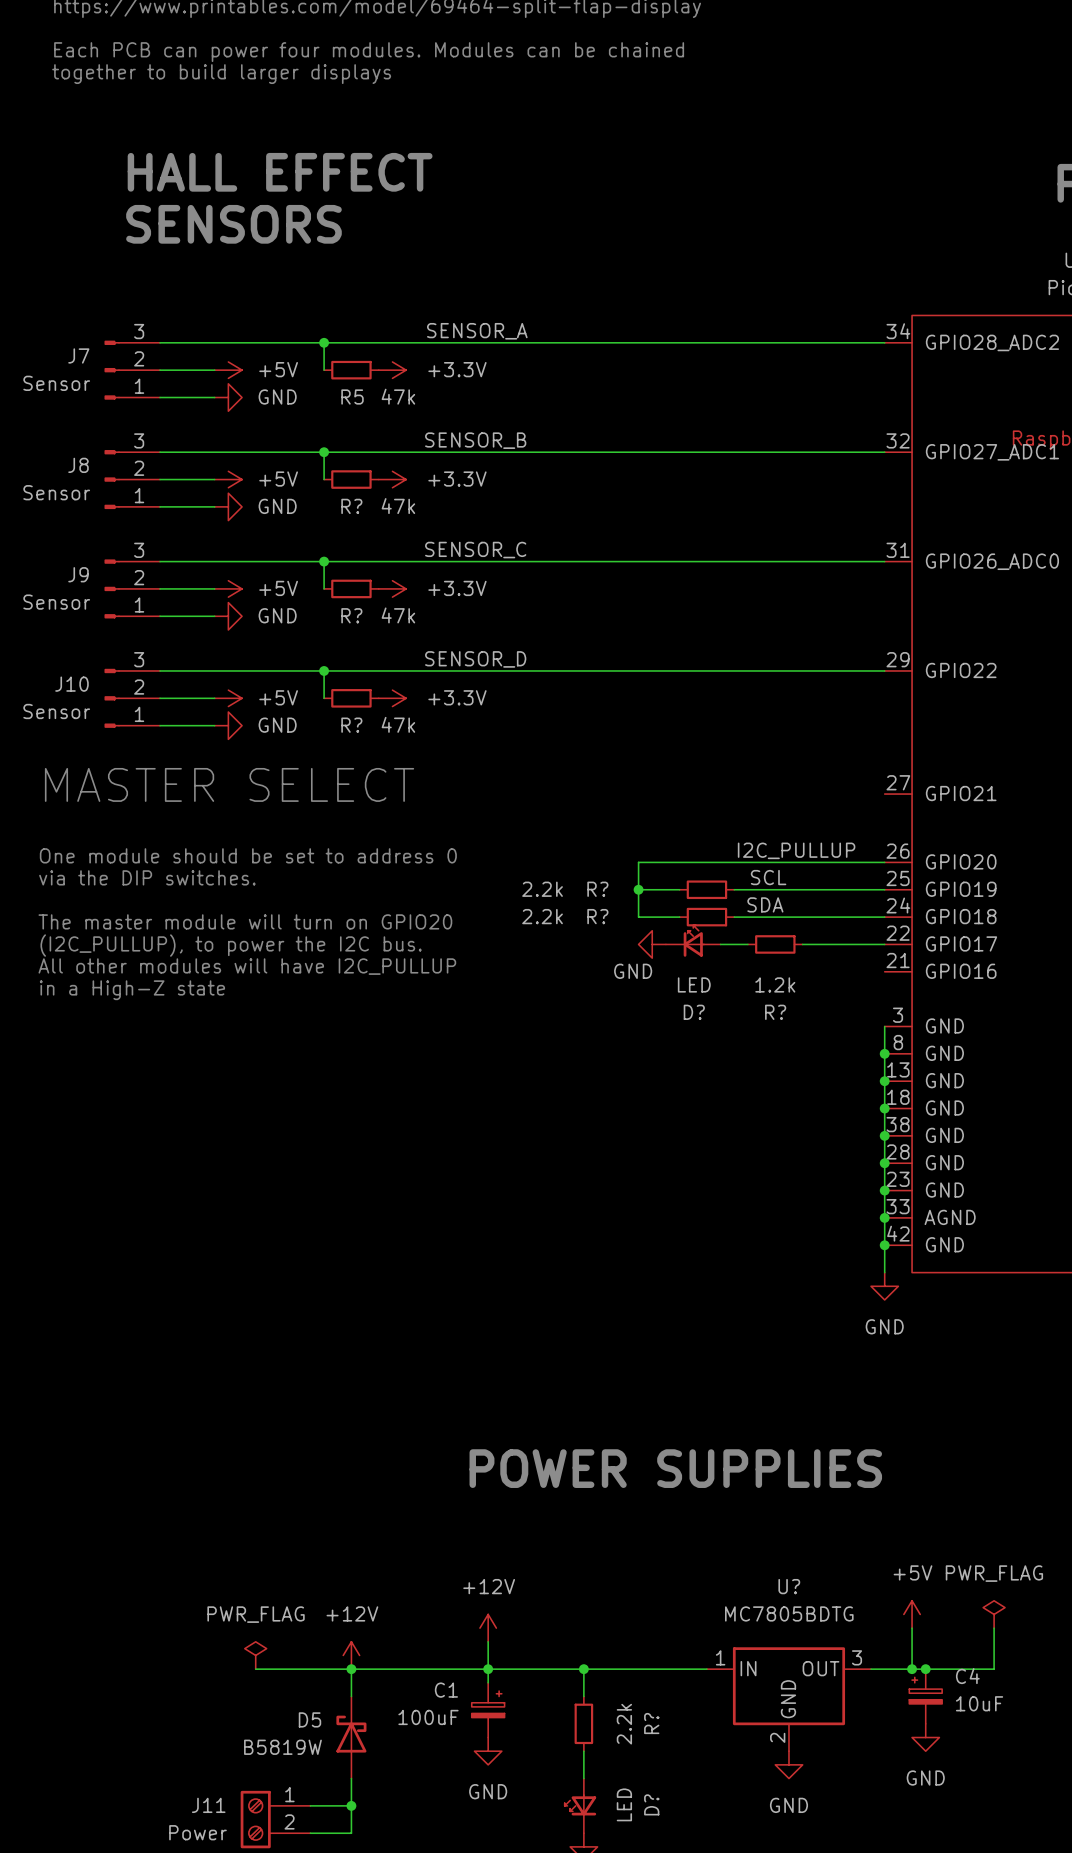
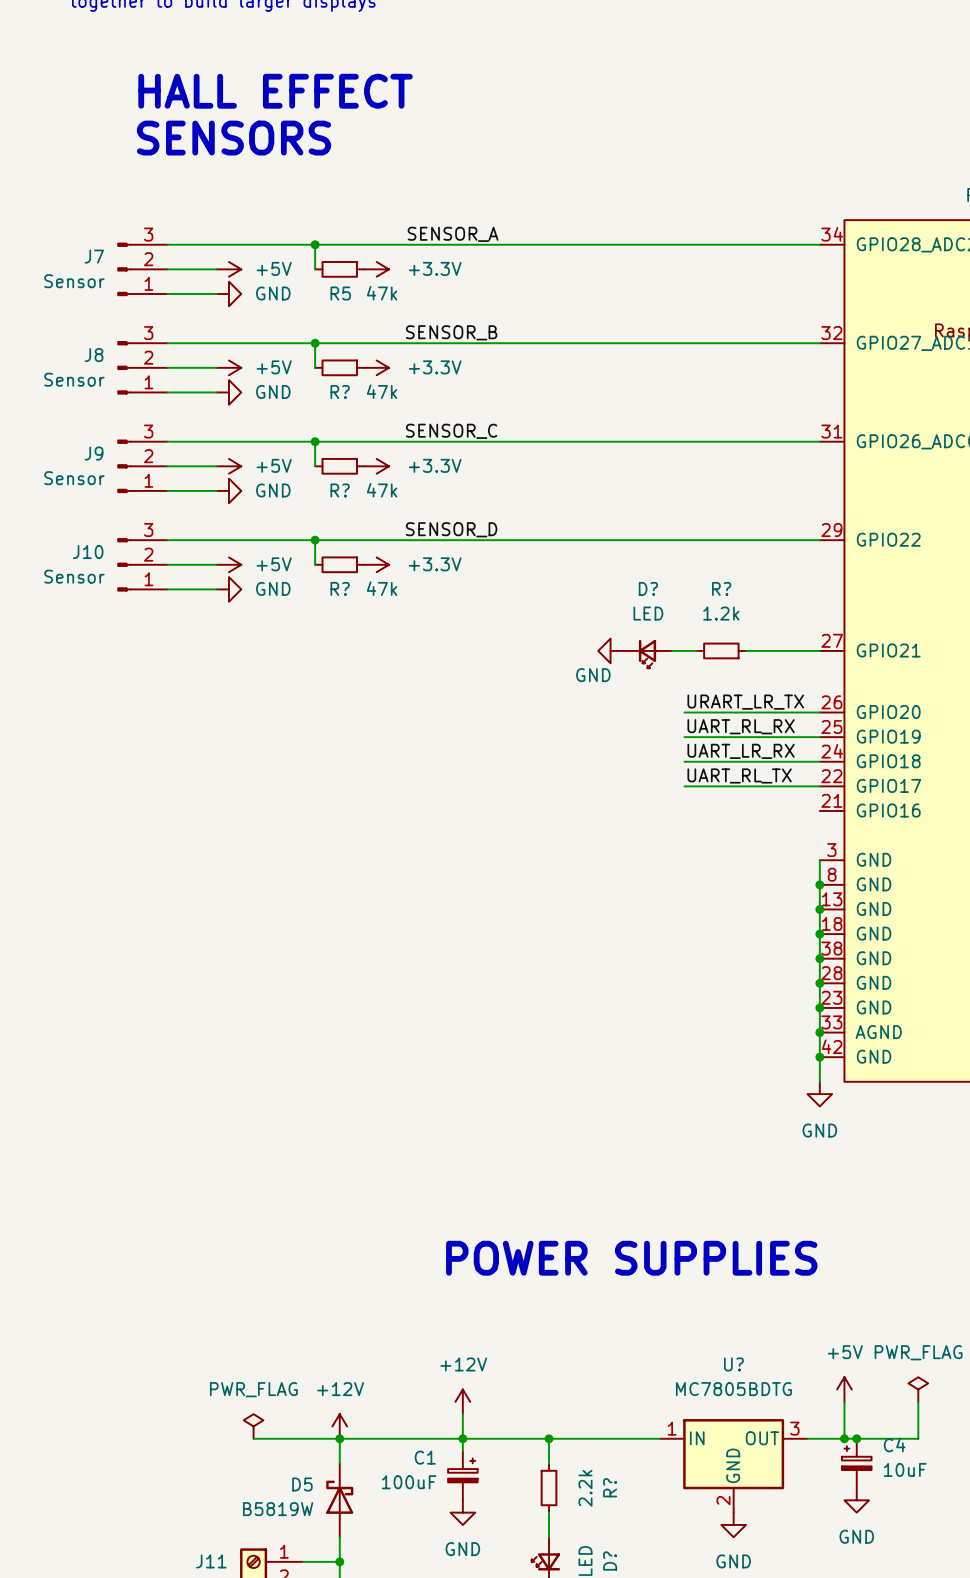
text: MASTER SELECT (229, 784) -> none
wire: none -> (672, 650) (696, 650)
wire: none -> (745, 650) (819, 650)
D?: none -> LED (647, 654)
label: I2C_PULLUP (796, 850) -> URART_LR_TX (745, 702)
text: One module should be set to address 0 (248, 855) -> none
wire: (734, 862) (638, 862) (638, 917) (679, 917) -> none
text: via the DIP switches. (147, 877) -> none
label: SCL (768, 877) -> none
label: none -> UART_RL_RX (741, 726)
wire: (638, 889) (679, 889) -> none
junction: (638, 889) -> none
R?: 2.2k (706, 889) -> none
label: SDA (765, 904) -> UART_LR_RX (741, 751)
R?: 2.2k (706, 917) -> none
text: The master module will turn on GPIO20 (245, 921) -> none
label: none -> UART_RL_TX (739, 775)
D?: LED (693, 941) -> none
power symbol position: GND (652, 944) -> GND (610, 650)
wire: (720, 944) (734, 944) -> none
wire: none -> (696, 786) (745, 786)
R? position: (775, 944) -> (721, 650)
text: (I2C_PULLUP), to power the I2C bus. (231, 945) -> none
text: All other modules will have I2C_PULLUP (247, 966) -> none
R? value position: 1.2k (775, 984) -> 1.2k (721, 613)
text: in a High-Z state (132, 990) -> none
R? name position: R? (775, 1012) -> R? (721, 588)

